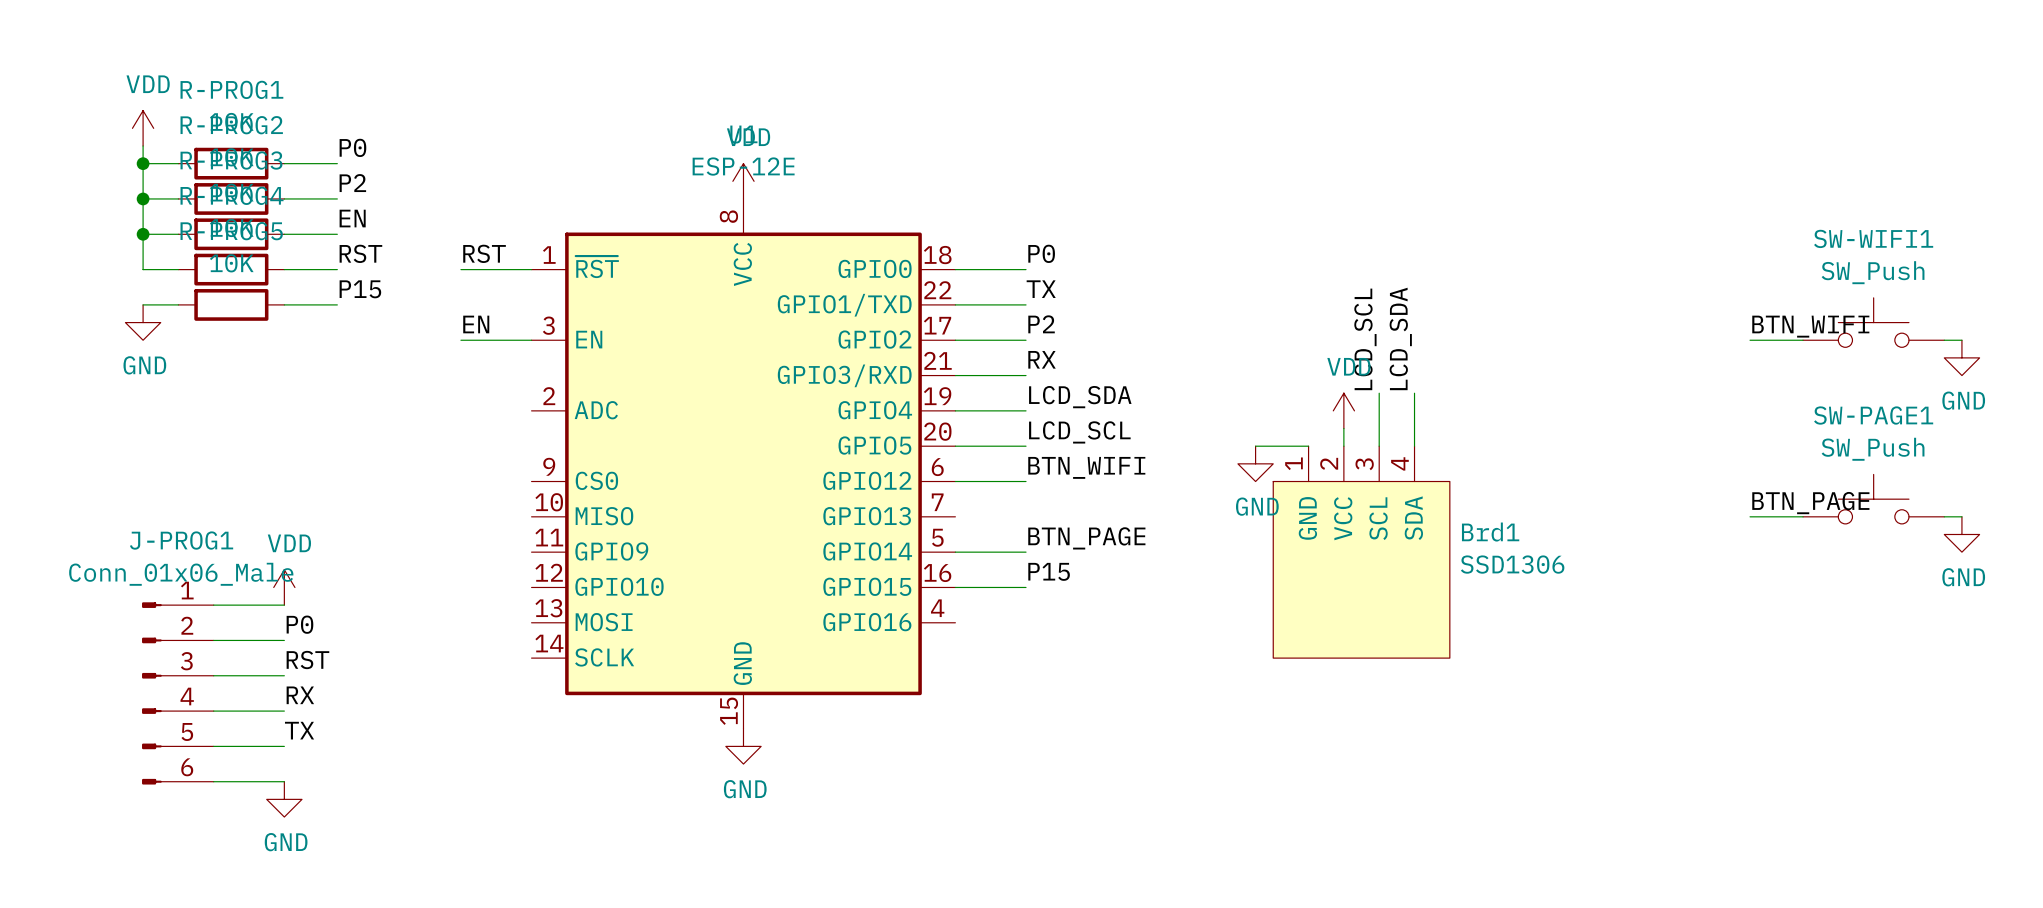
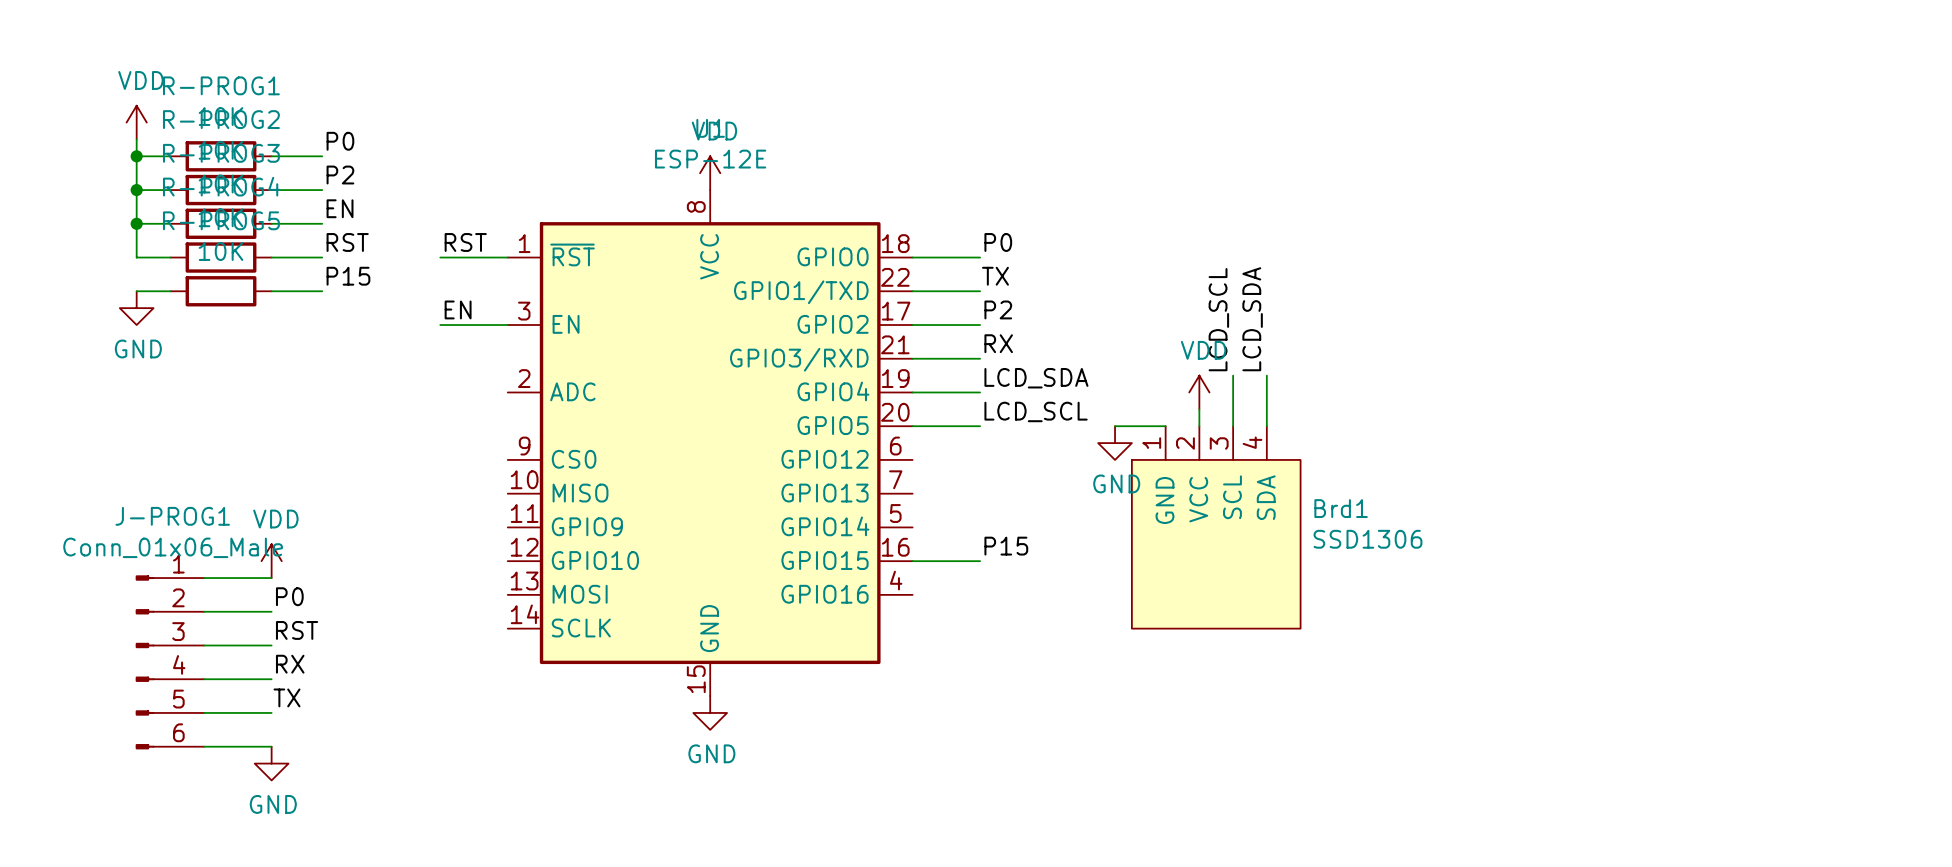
SW-WIFI1: SW_Push (1873, 322) -> none
label: BTN_WIFI (1810, 326) -> none
label position: LCD_SDA (1400, 338) -> LCD_SDA (1252, 319)
label position: LCD_SCL (1365, 339) -> LCD_SCL (1218, 319)
wire: (1750, 340) (1803, 340) -> none
wire: (1944, 340) (1961, 340) -> none
power symbol: GND (1961, 357) -> none
wire: (1379, 393) (1379, 446) -> (1233, 375) (1233, 426)
wire: (1414, 393) (1414, 446) -> (1266, 375) (1266, 426)
power symbol position: VDD (1343, 410) -> VDD (1199, 392)
wire: (1343, 428) (1343, 446) -> none
wire: none -> (1115, 426) (1165, 426)
wire: (1255, 446) (1308, 446) -> (1199, 426) (1199, 409)
power symbol position: GND (1255, 463) -> GND (1115, 443)
label: BTN_WIFI (1086, 467) -> none
wire: (955, 481) (1026, 481) -> none
SW-PAGE1: SW_Push (1873, 499) -> none
label: BTN_PAGE (1810, 503) -> none
wire: (1750, 516) (1803, 516) -> none
wire: (1944, 516) (1961, 516) -> none
power symbol: GND (1961, 534) -> none
label: BTN_PAGE (1086, 538) -> none
wire: (955, 552) (1026, 552) -> none
Brd1 position: (1361, 552) -> (1216, 527)

